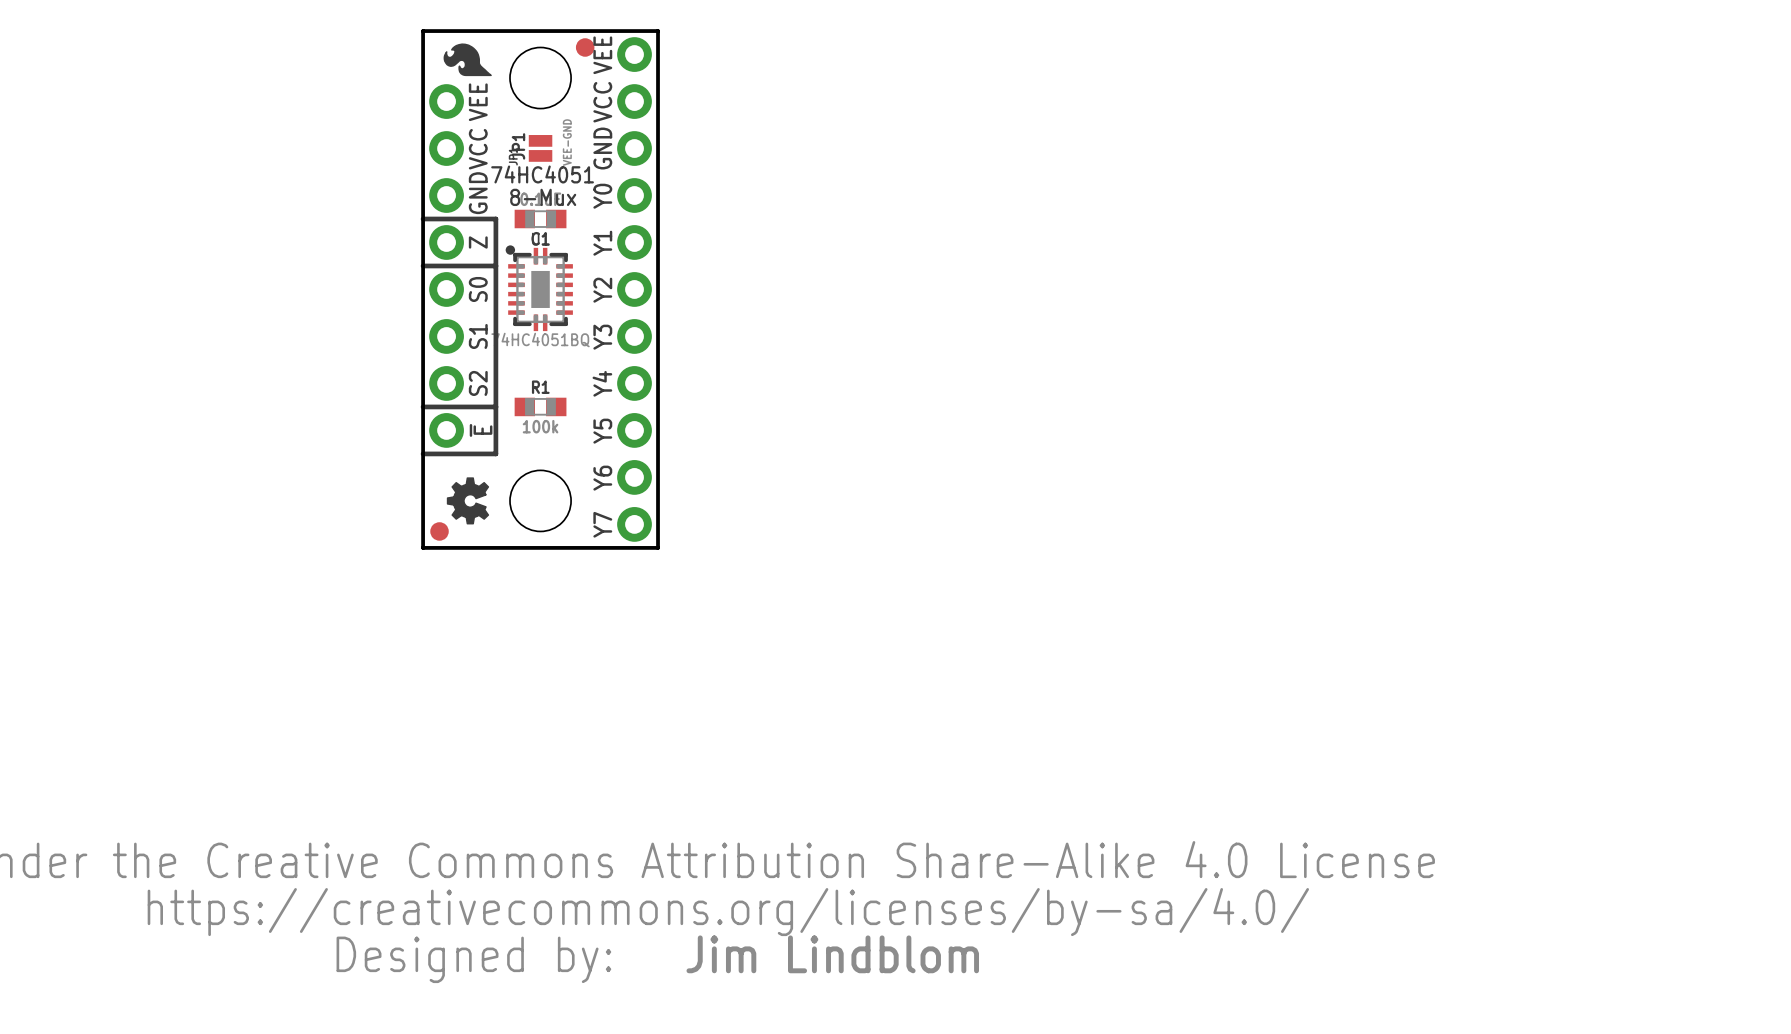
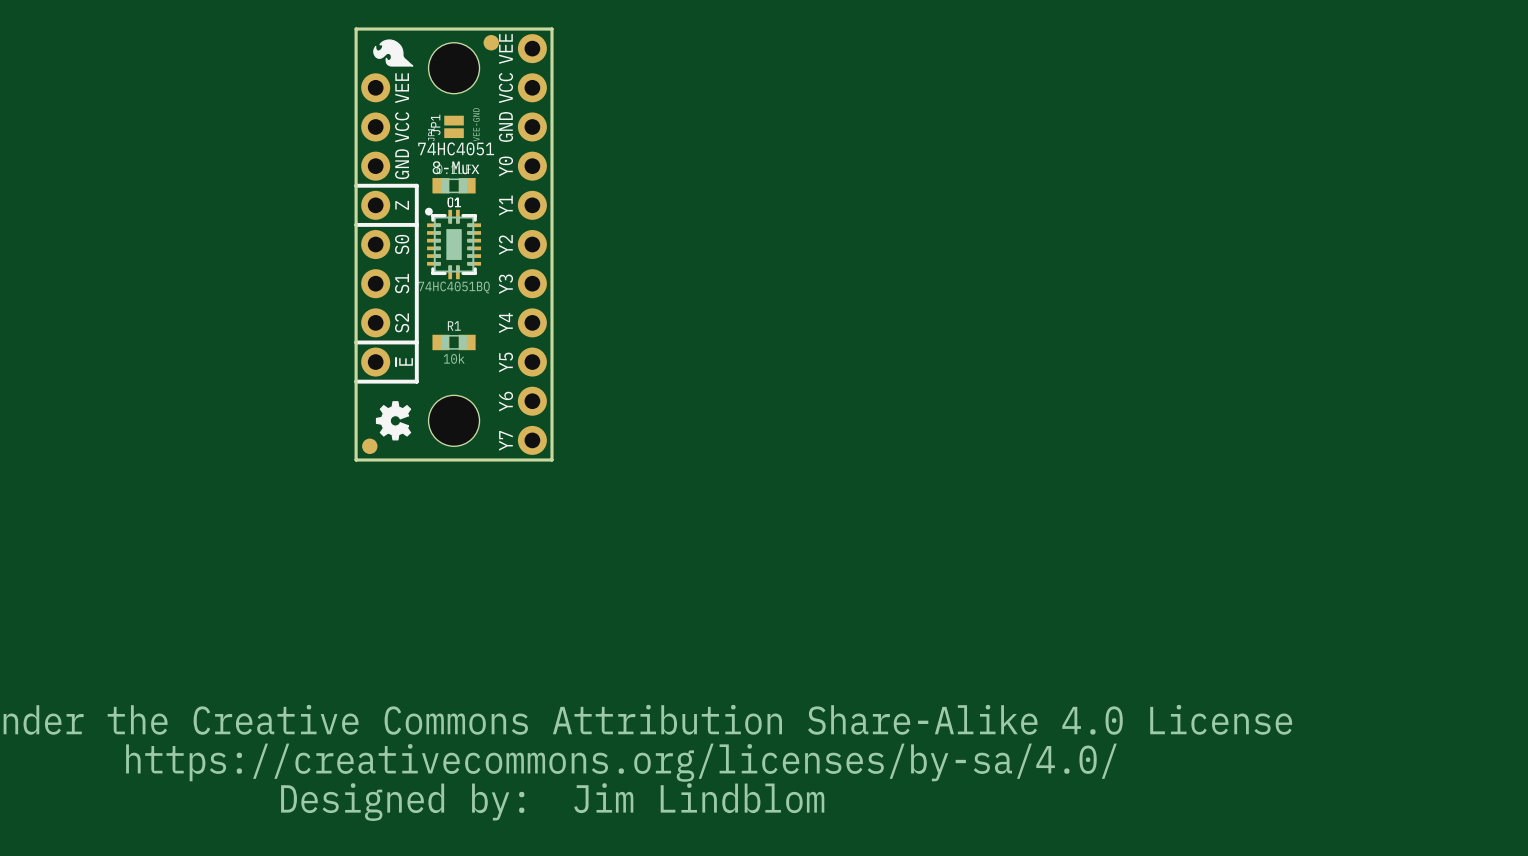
R1 value: 100k (540, 426) -> 10k (454, 358)

